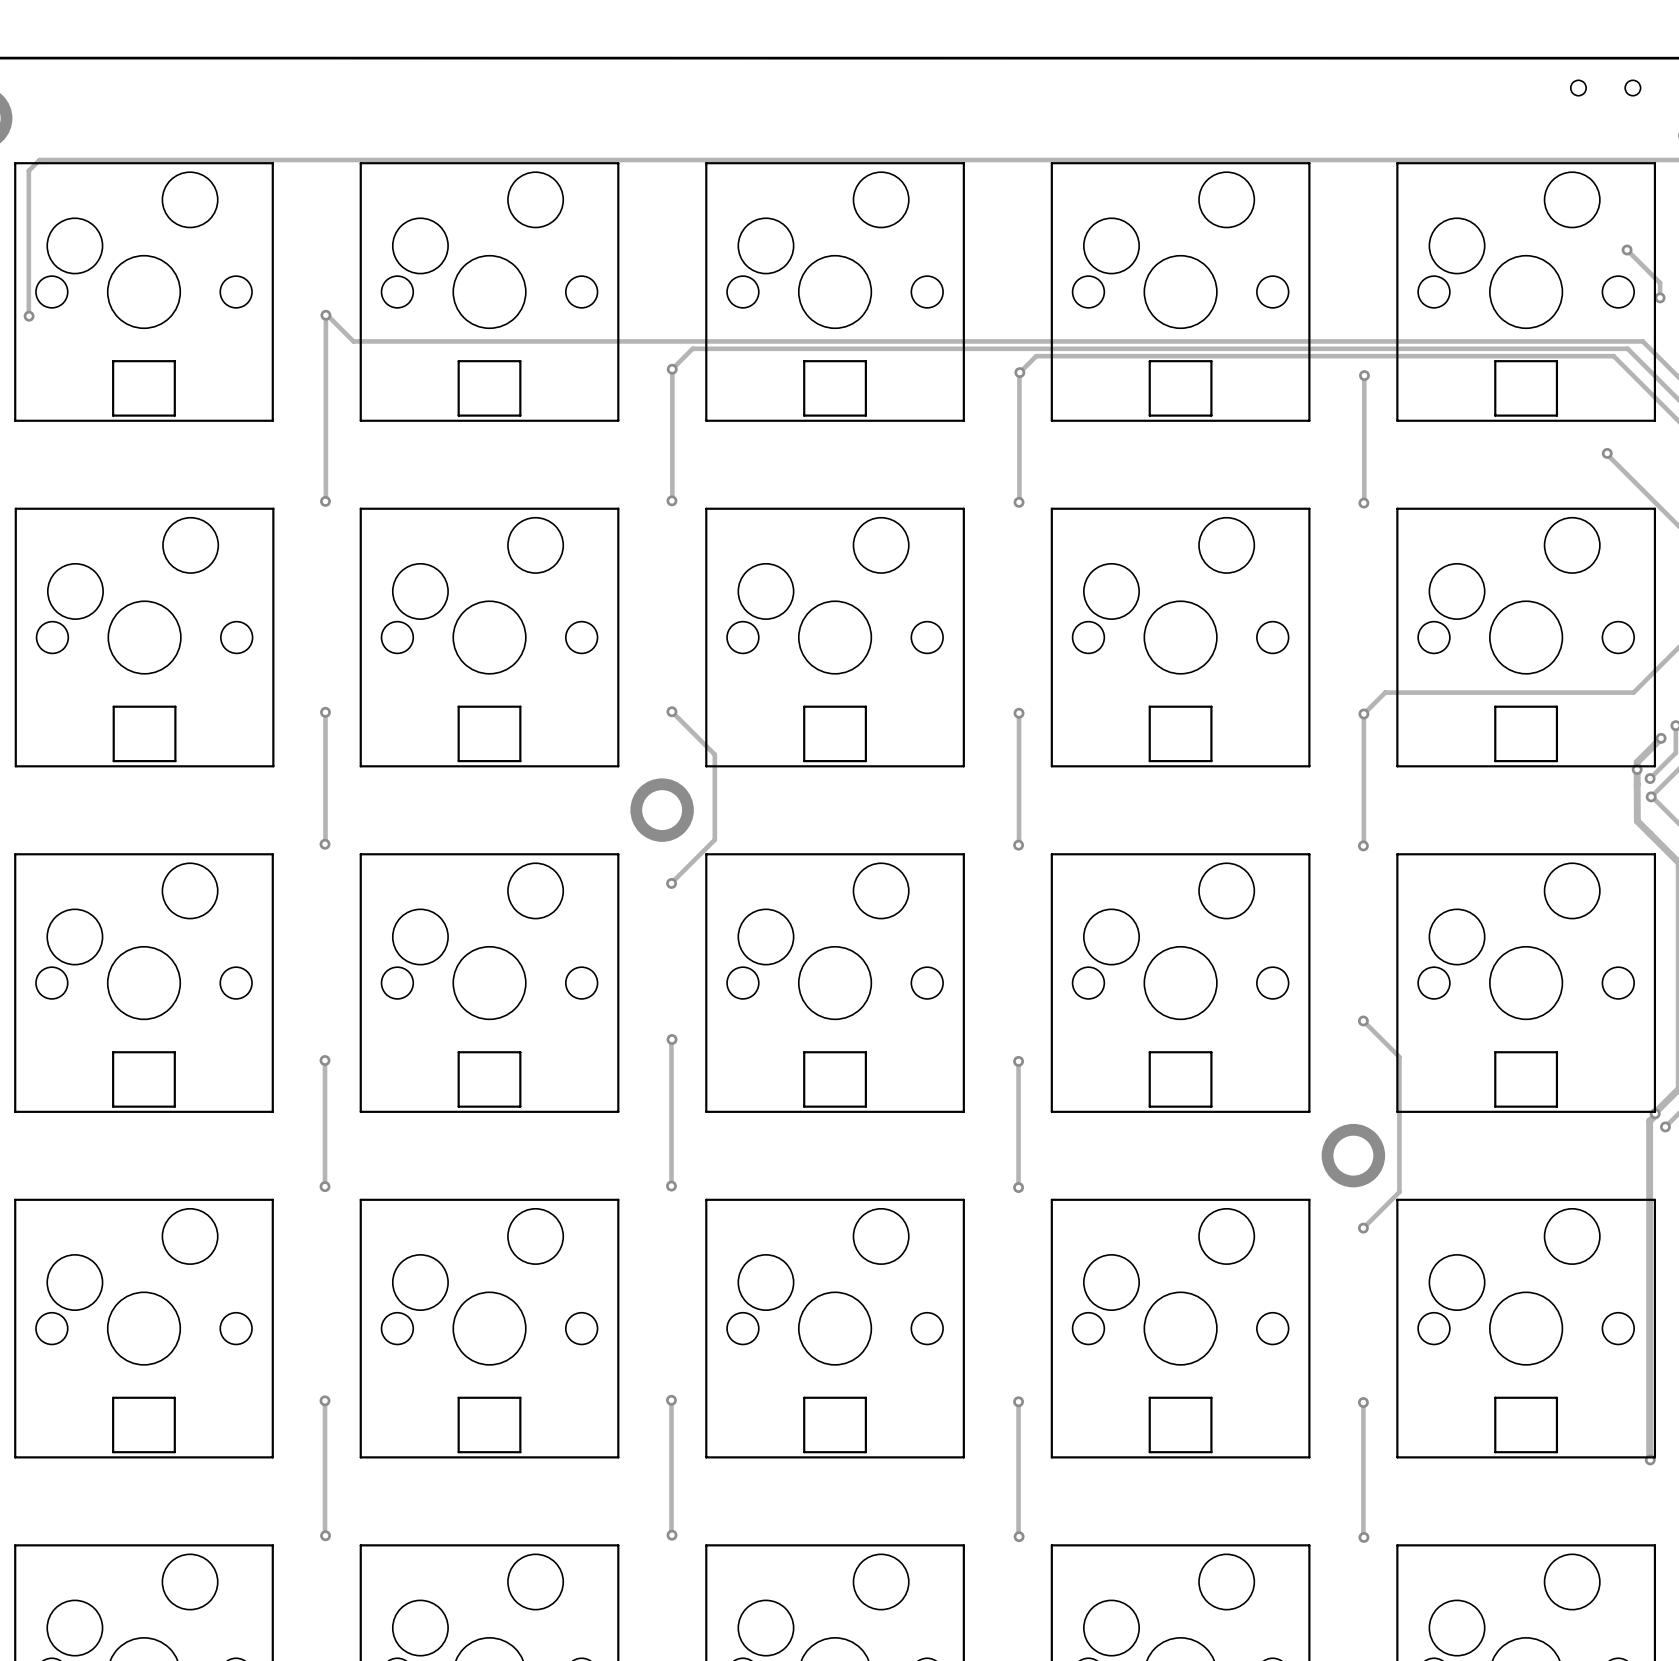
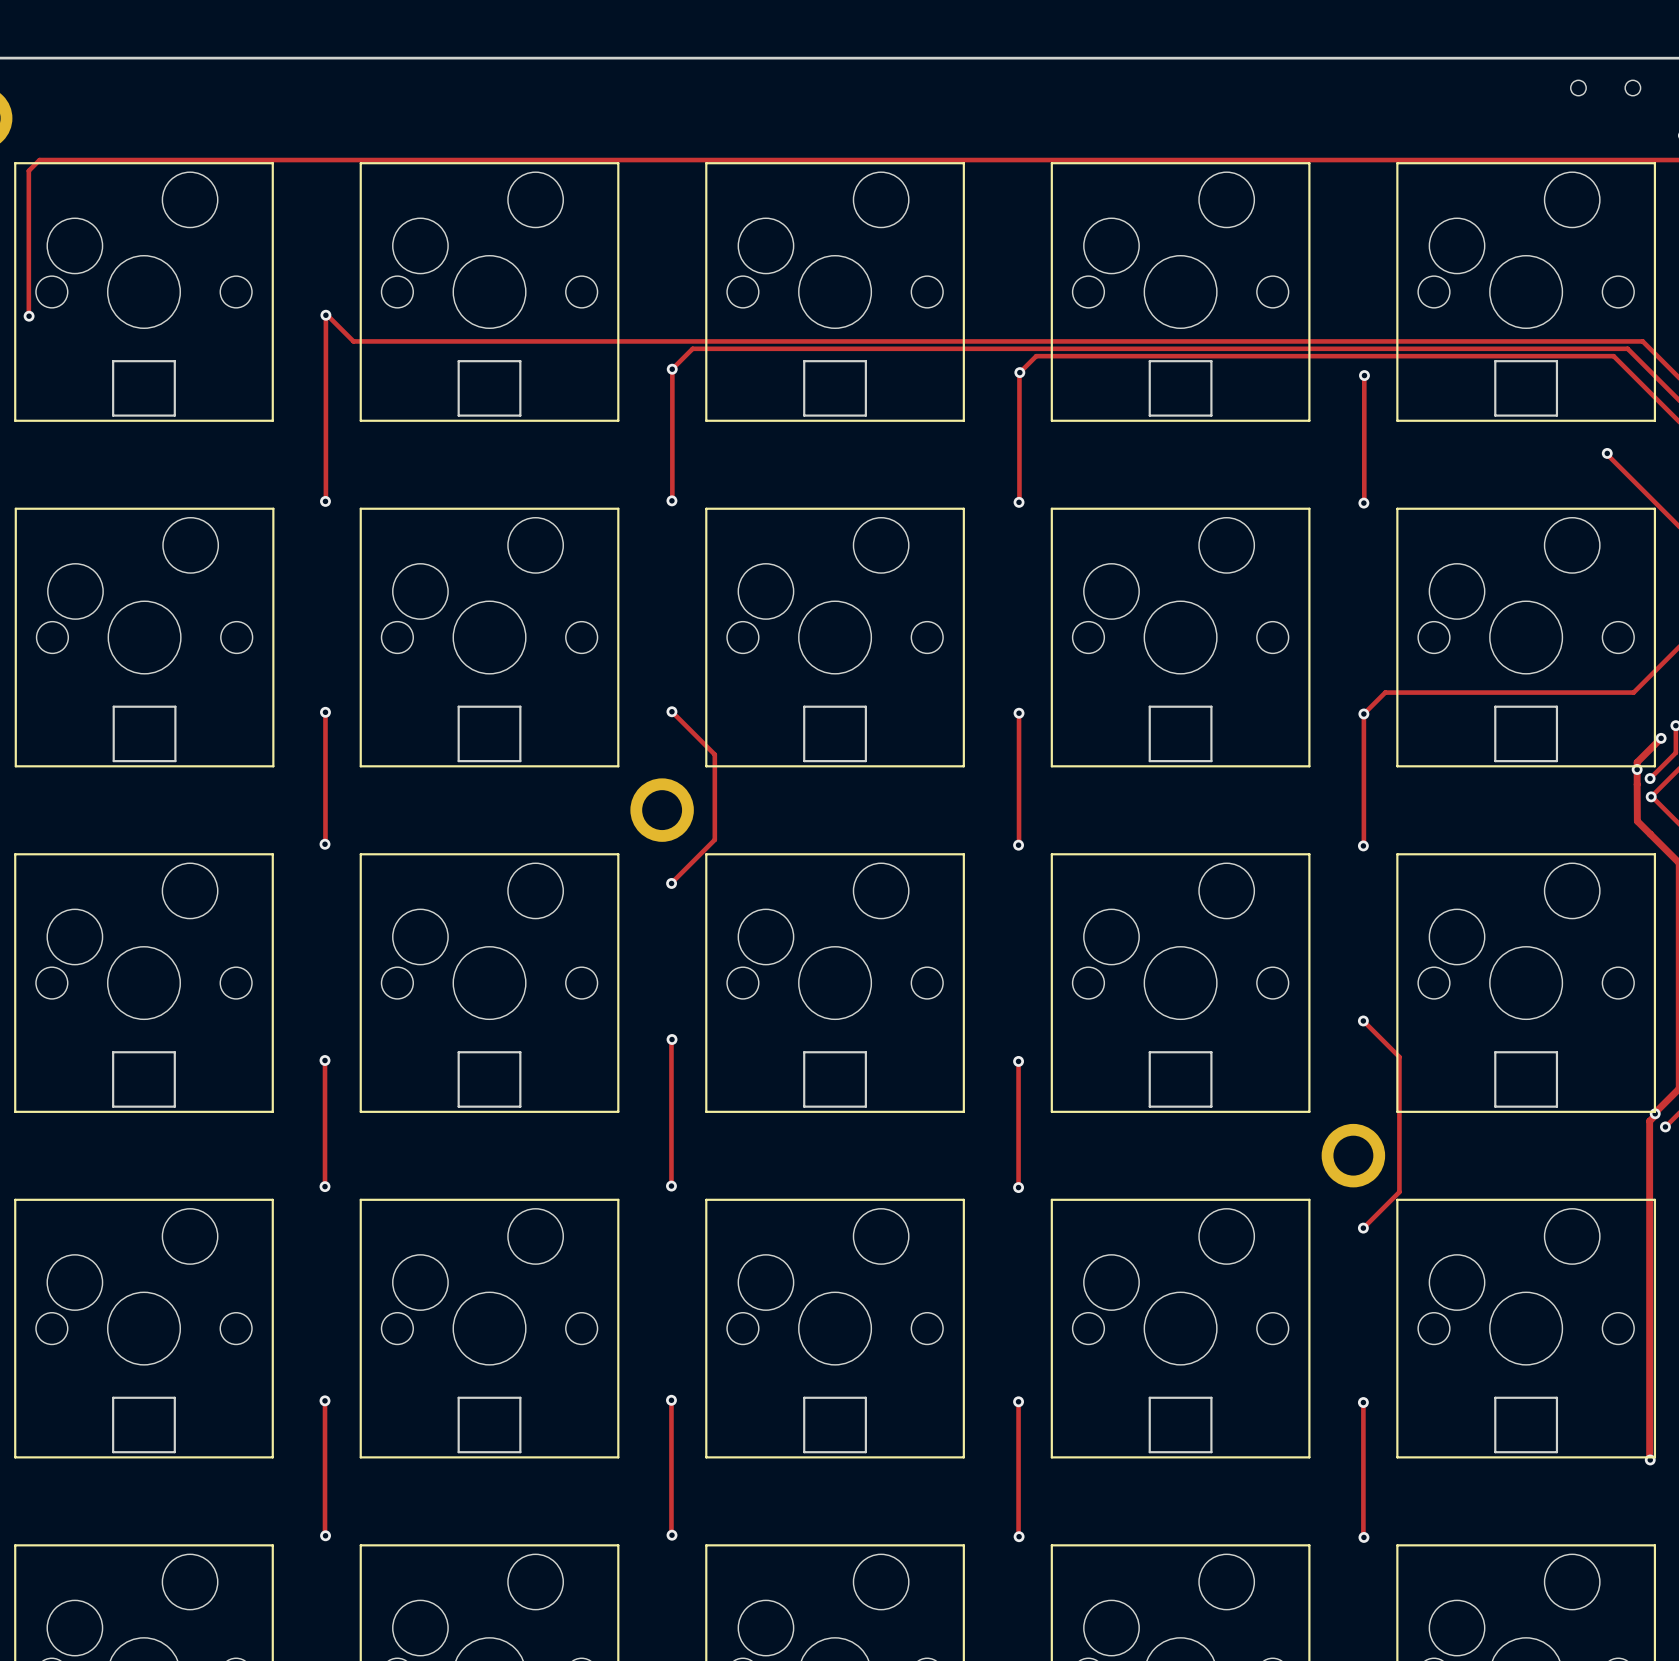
track: (1627, 250) (1660, 283) (1660, 297) -> none
via: (1627, 250) -> none
via: (1660, 297) -> none

